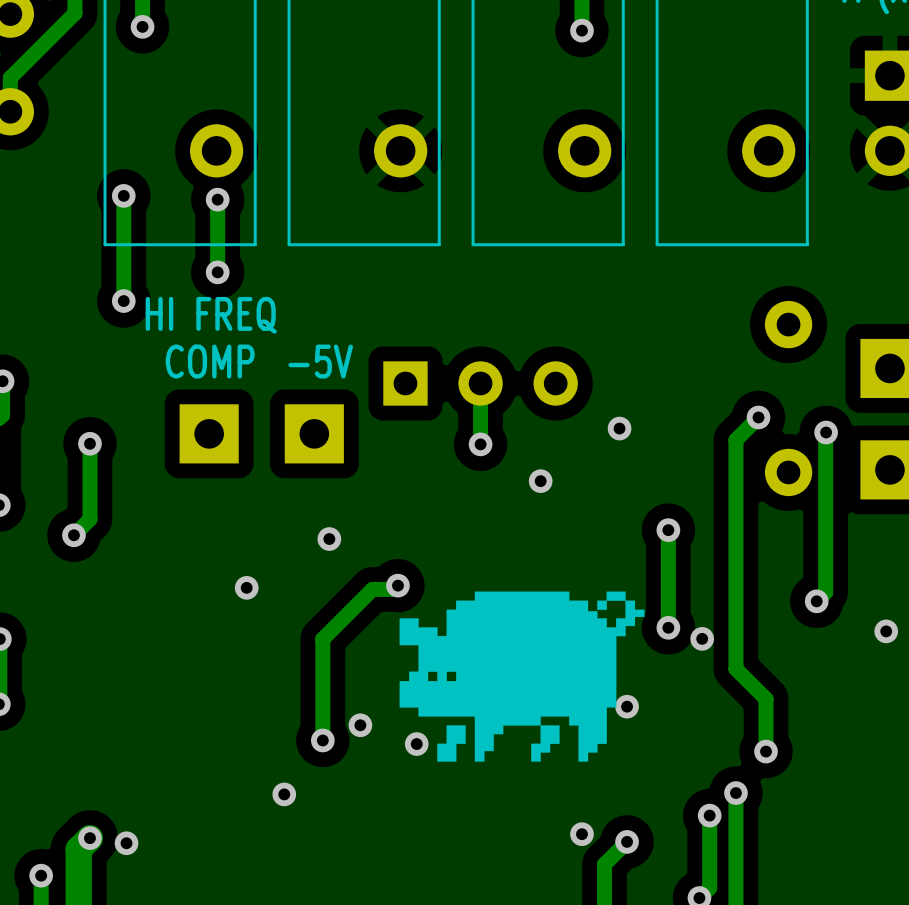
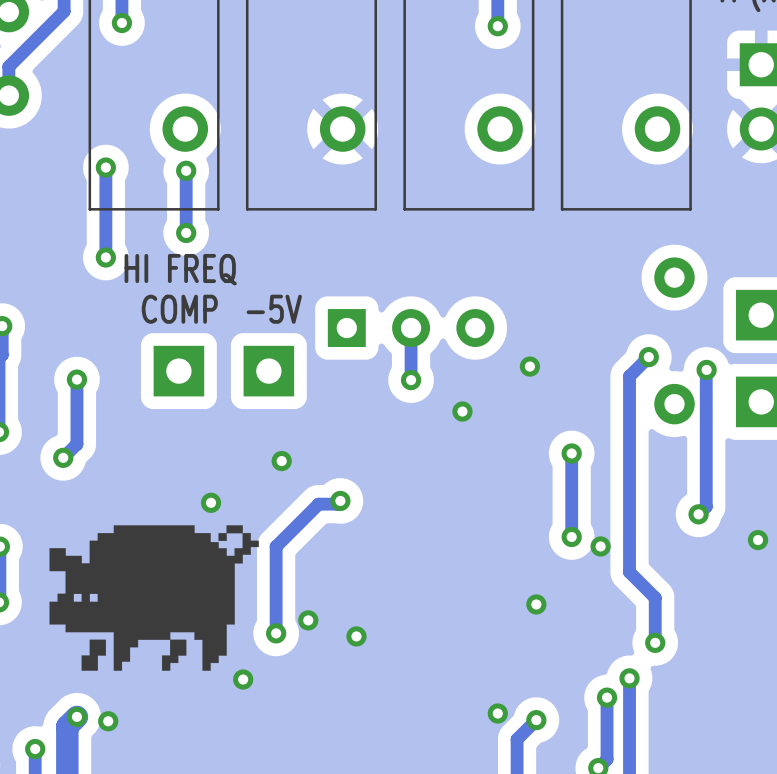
drawing position: (522, 676) -> (154, 598)

